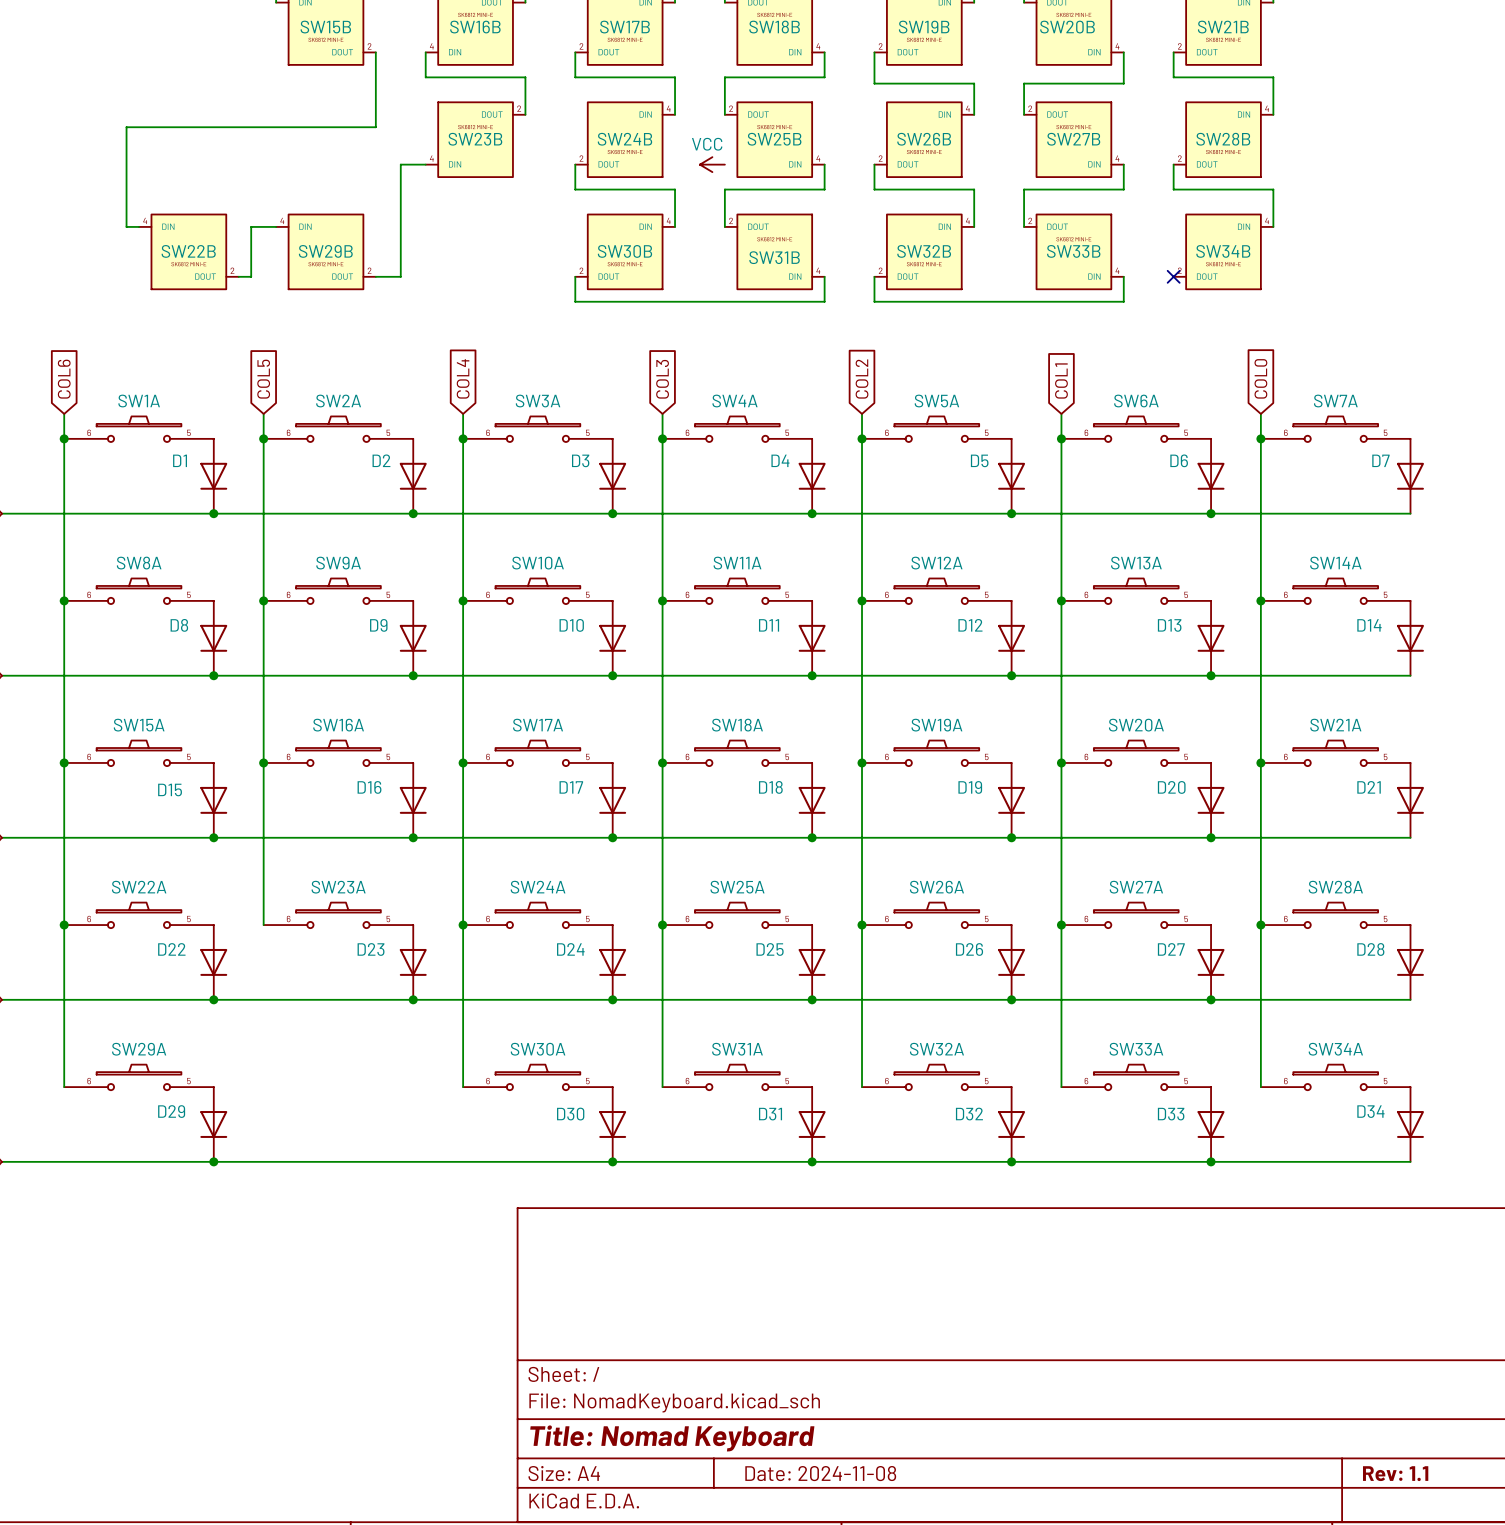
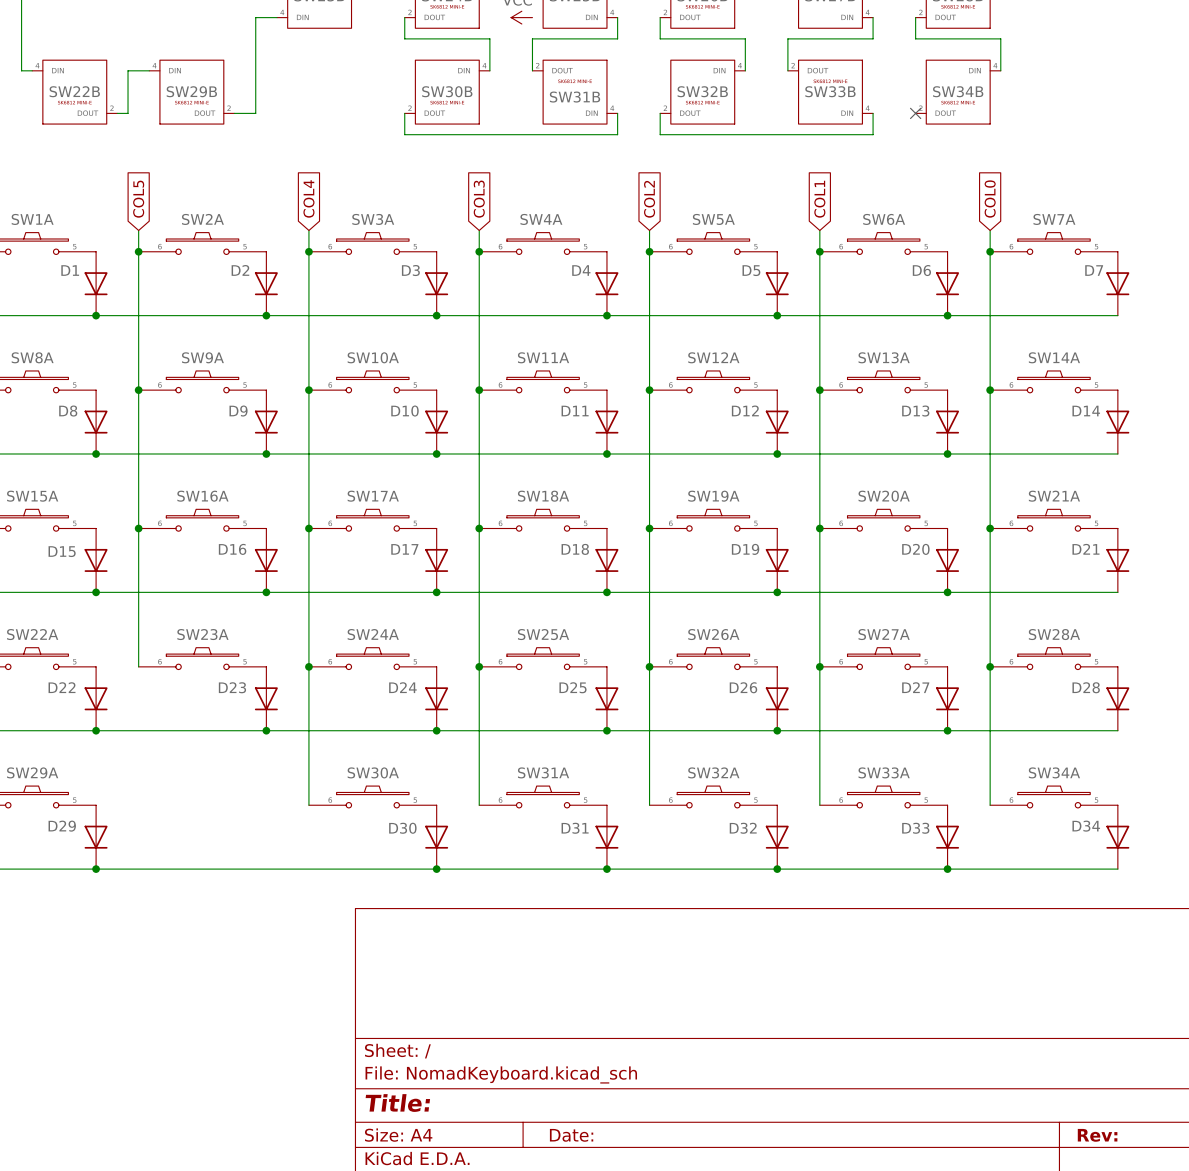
title block: Title: Nomad Keyboard (672, 1438) -> Title: (397, 1103)
title block: Date: 2024-11-08 (820, 1473) -> Date: (571, 1135)
title block: Rev: 1.1 (1395, 1473) -> Rev: (1097, 1135)

